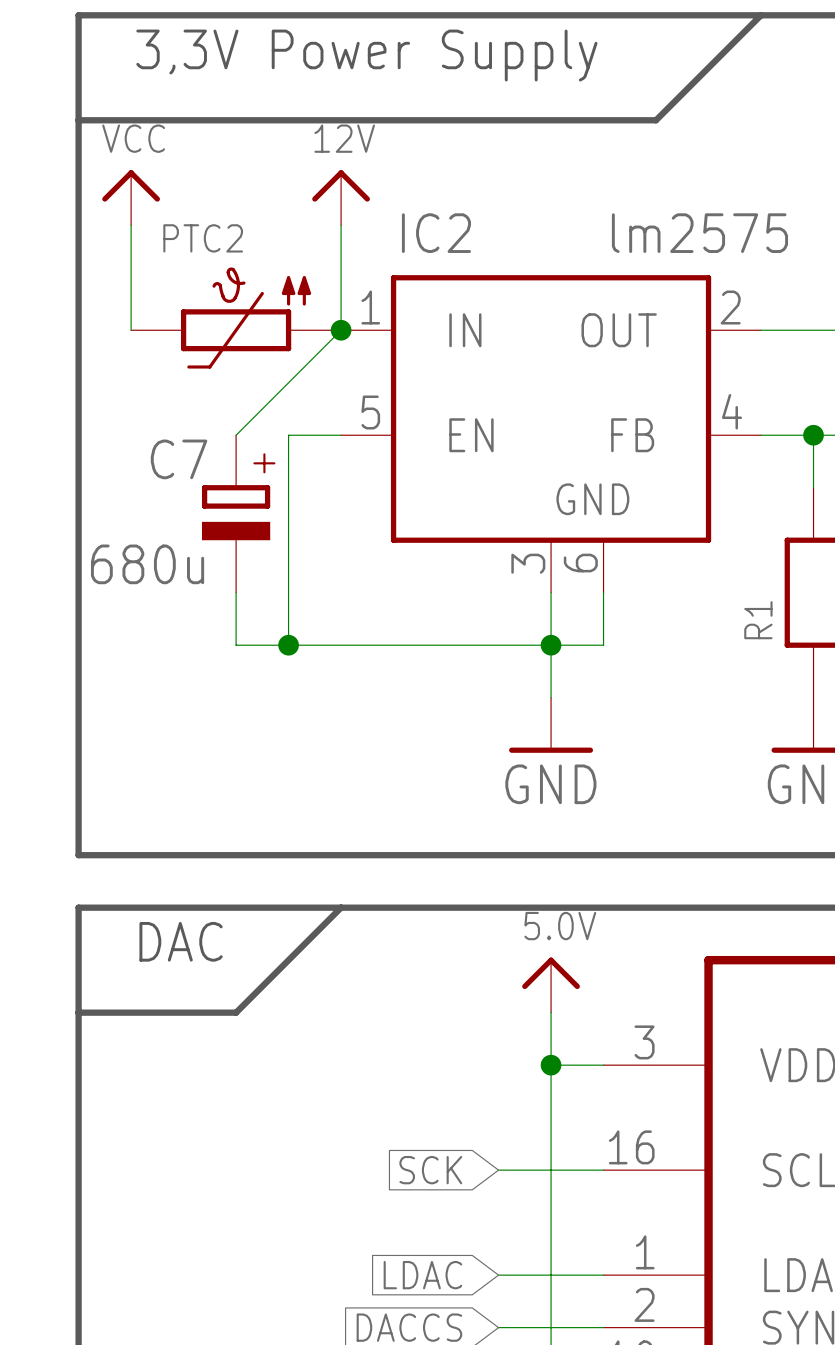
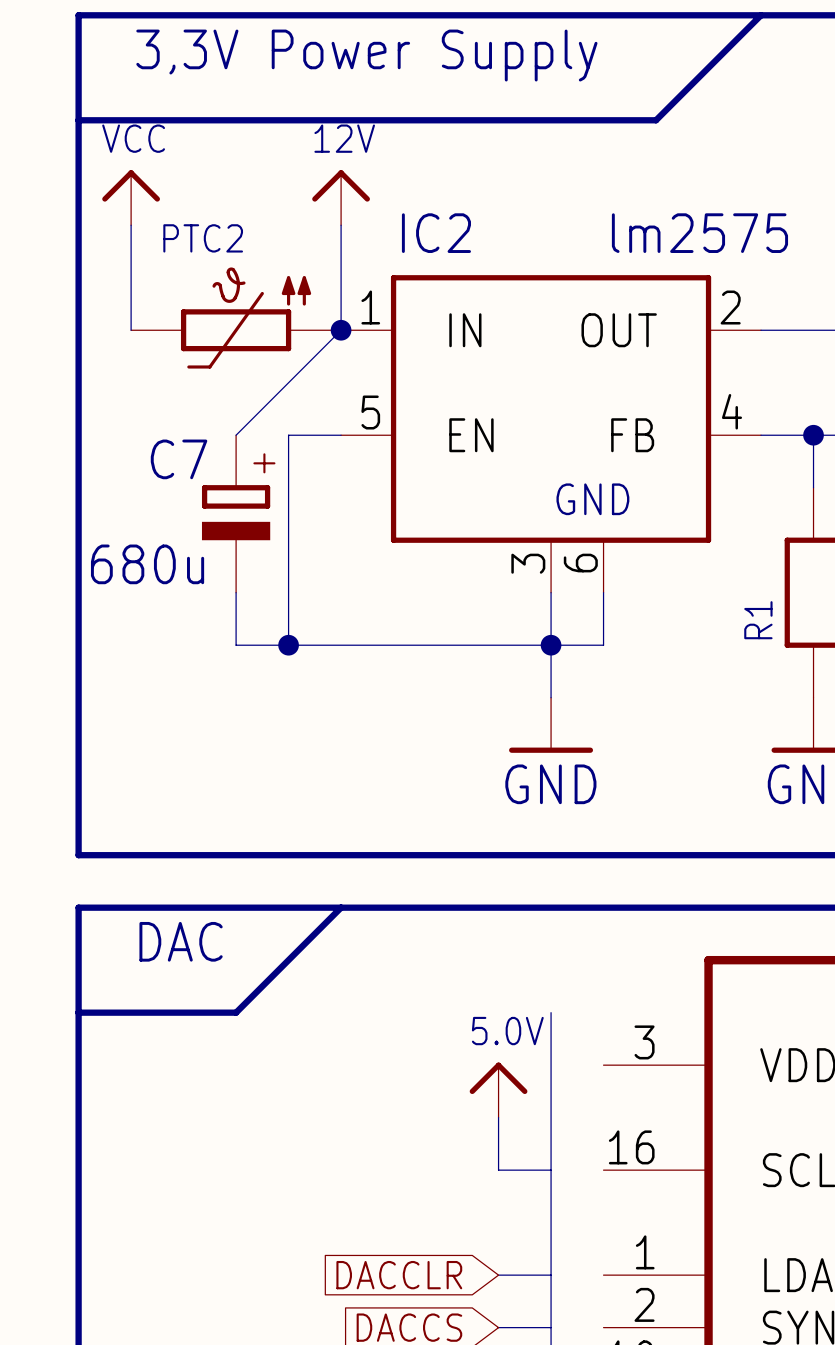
power symbol position: 5.0V (551, 985) -> 5.0V (498, 1090)
wire: (551, 1065) (603, 1065) -> none
junction: (551, 1065) -> none
wire: none -> (498, 1117) (498, 1170)
global label: SCK (430, 1170) -> none
wire: (551, 1170) (603, 1170) -> none
global label: LDAC (422, 1275) -> DACCLR (399, 1275)
wire: (551, 1275) (603, 1275) -> none
wire: (551, 1327) (603, 1327) -> none

